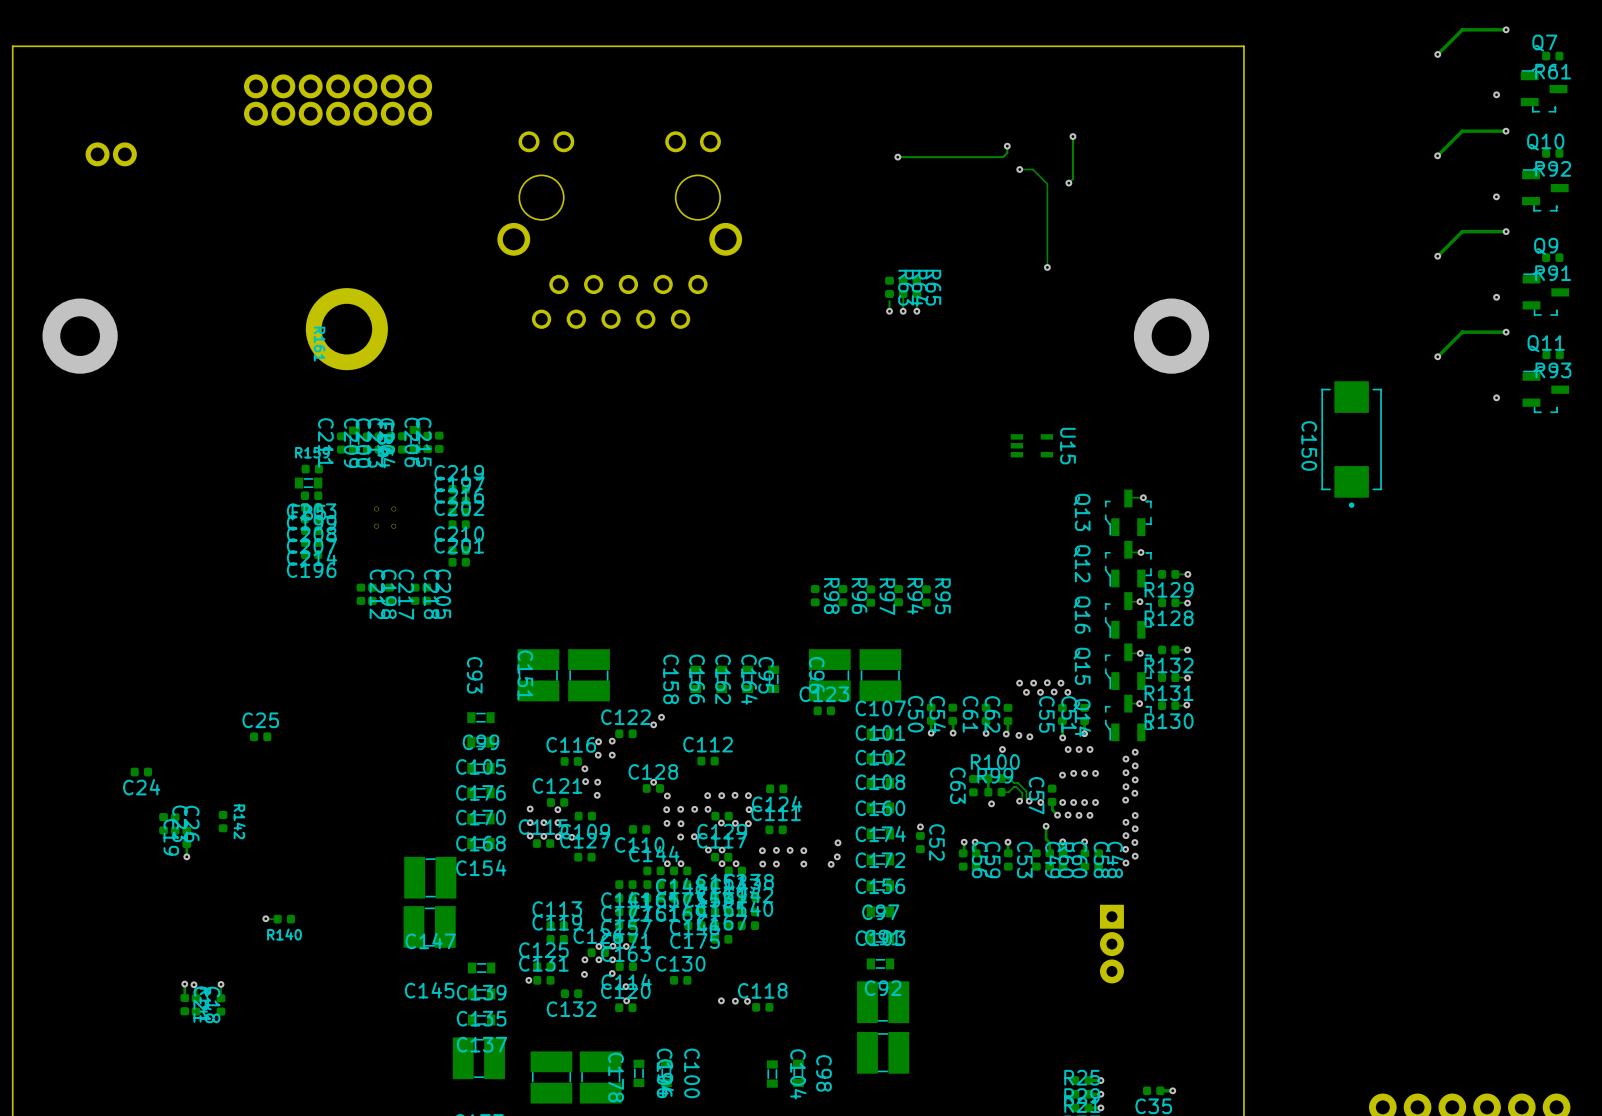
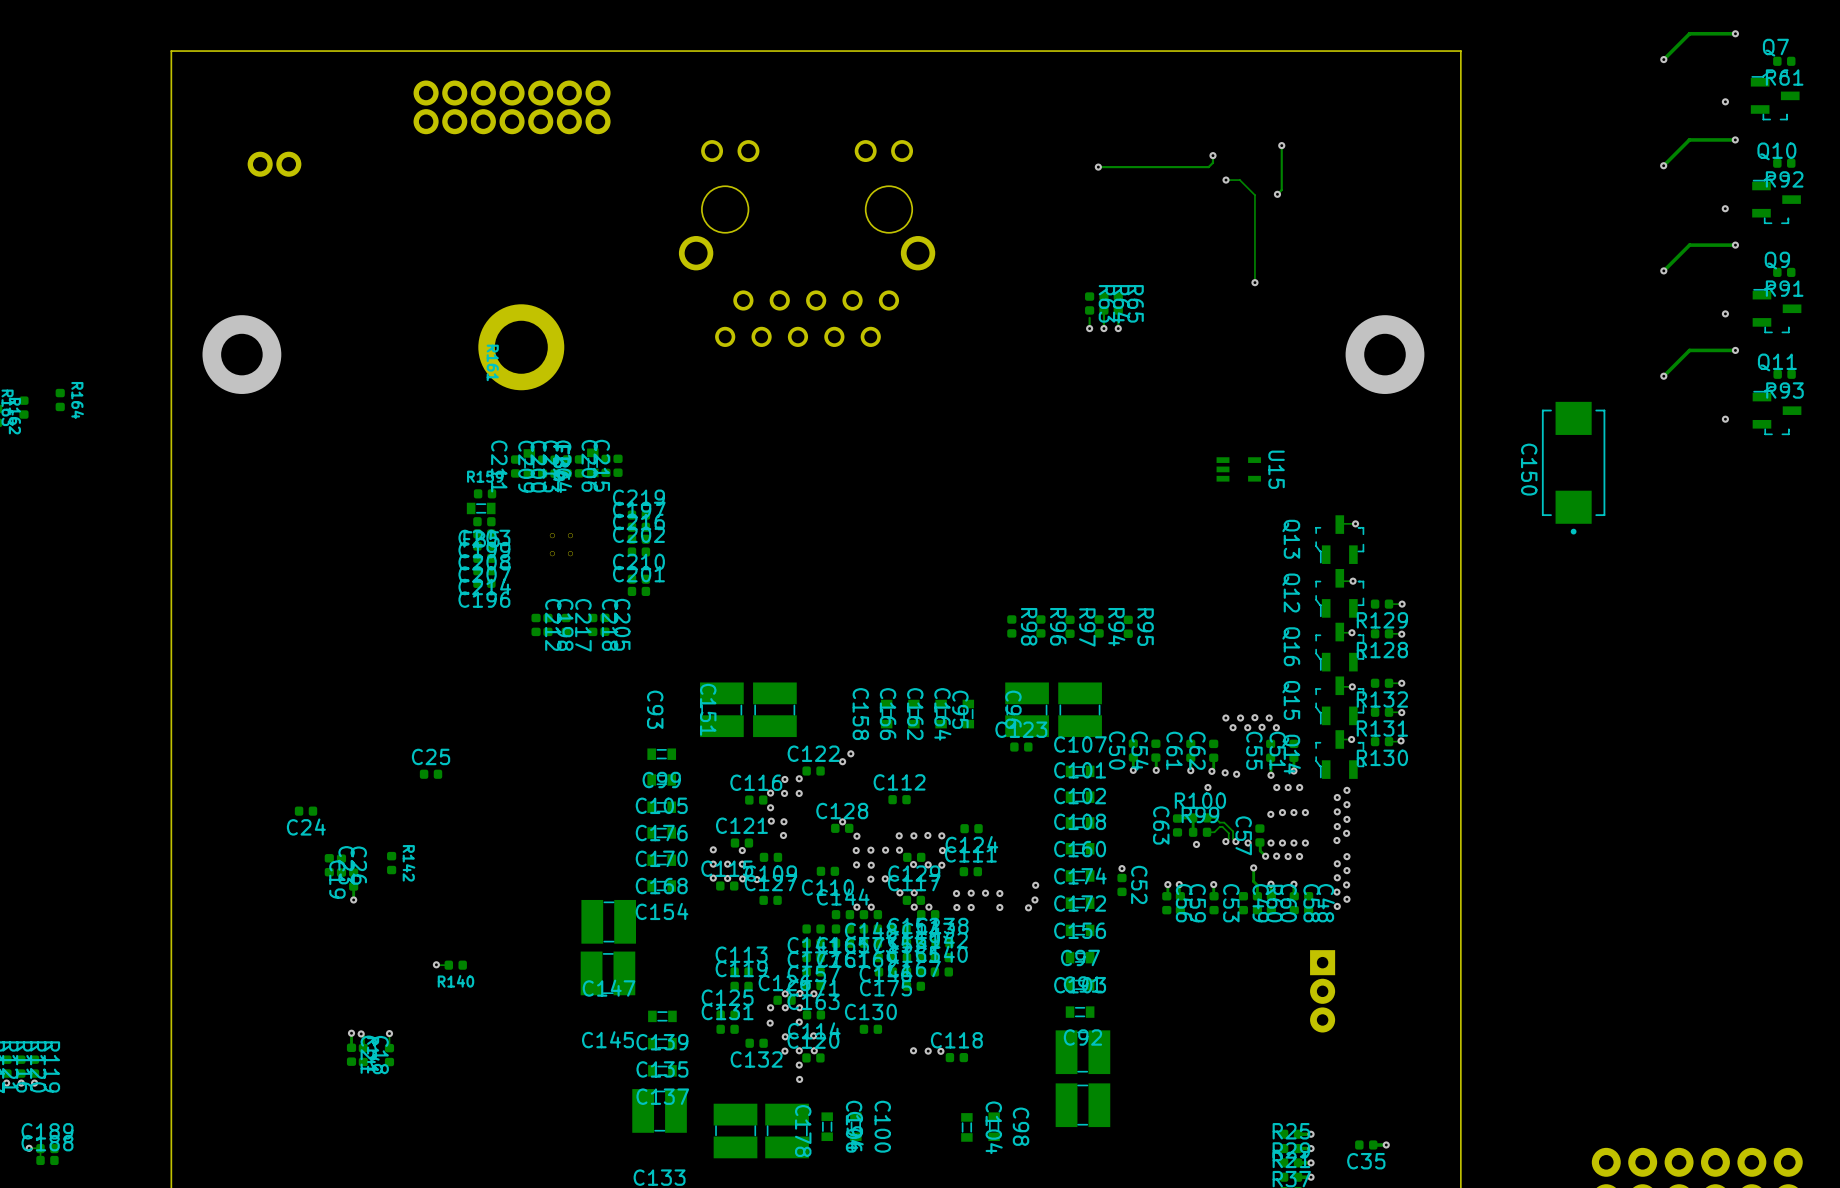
via: none -> (770, 793)
via: (528, 980) -> none
via: none -> (785, 1036)
via: none -> (799, 1050)
via: none -> (784, 1051)
via: none -> (799, 1065)
via: none -> (799, 1079)

